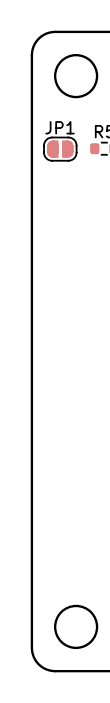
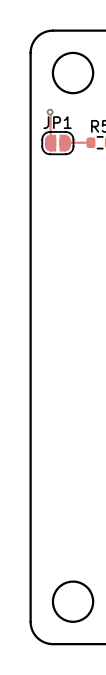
track: none -> (50, 112) (50, 143)
via: none -> (50, 112)
track: none -> (90, 142) (65, 143)

